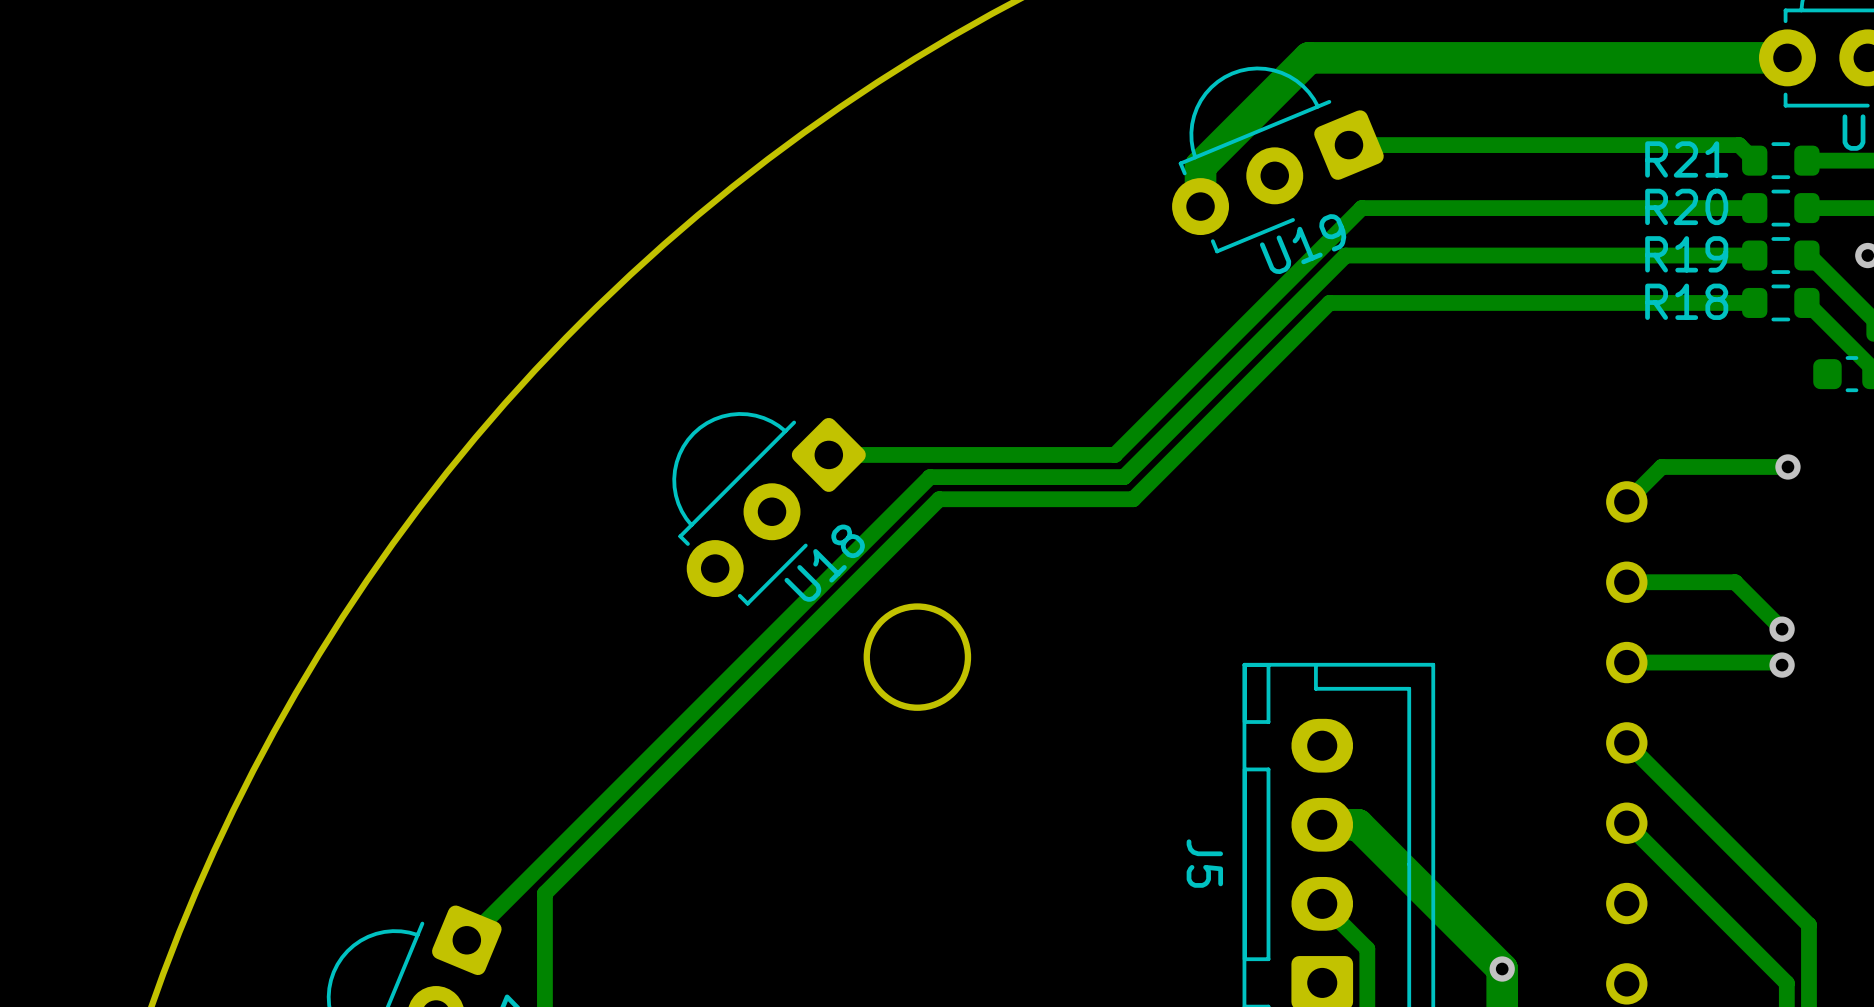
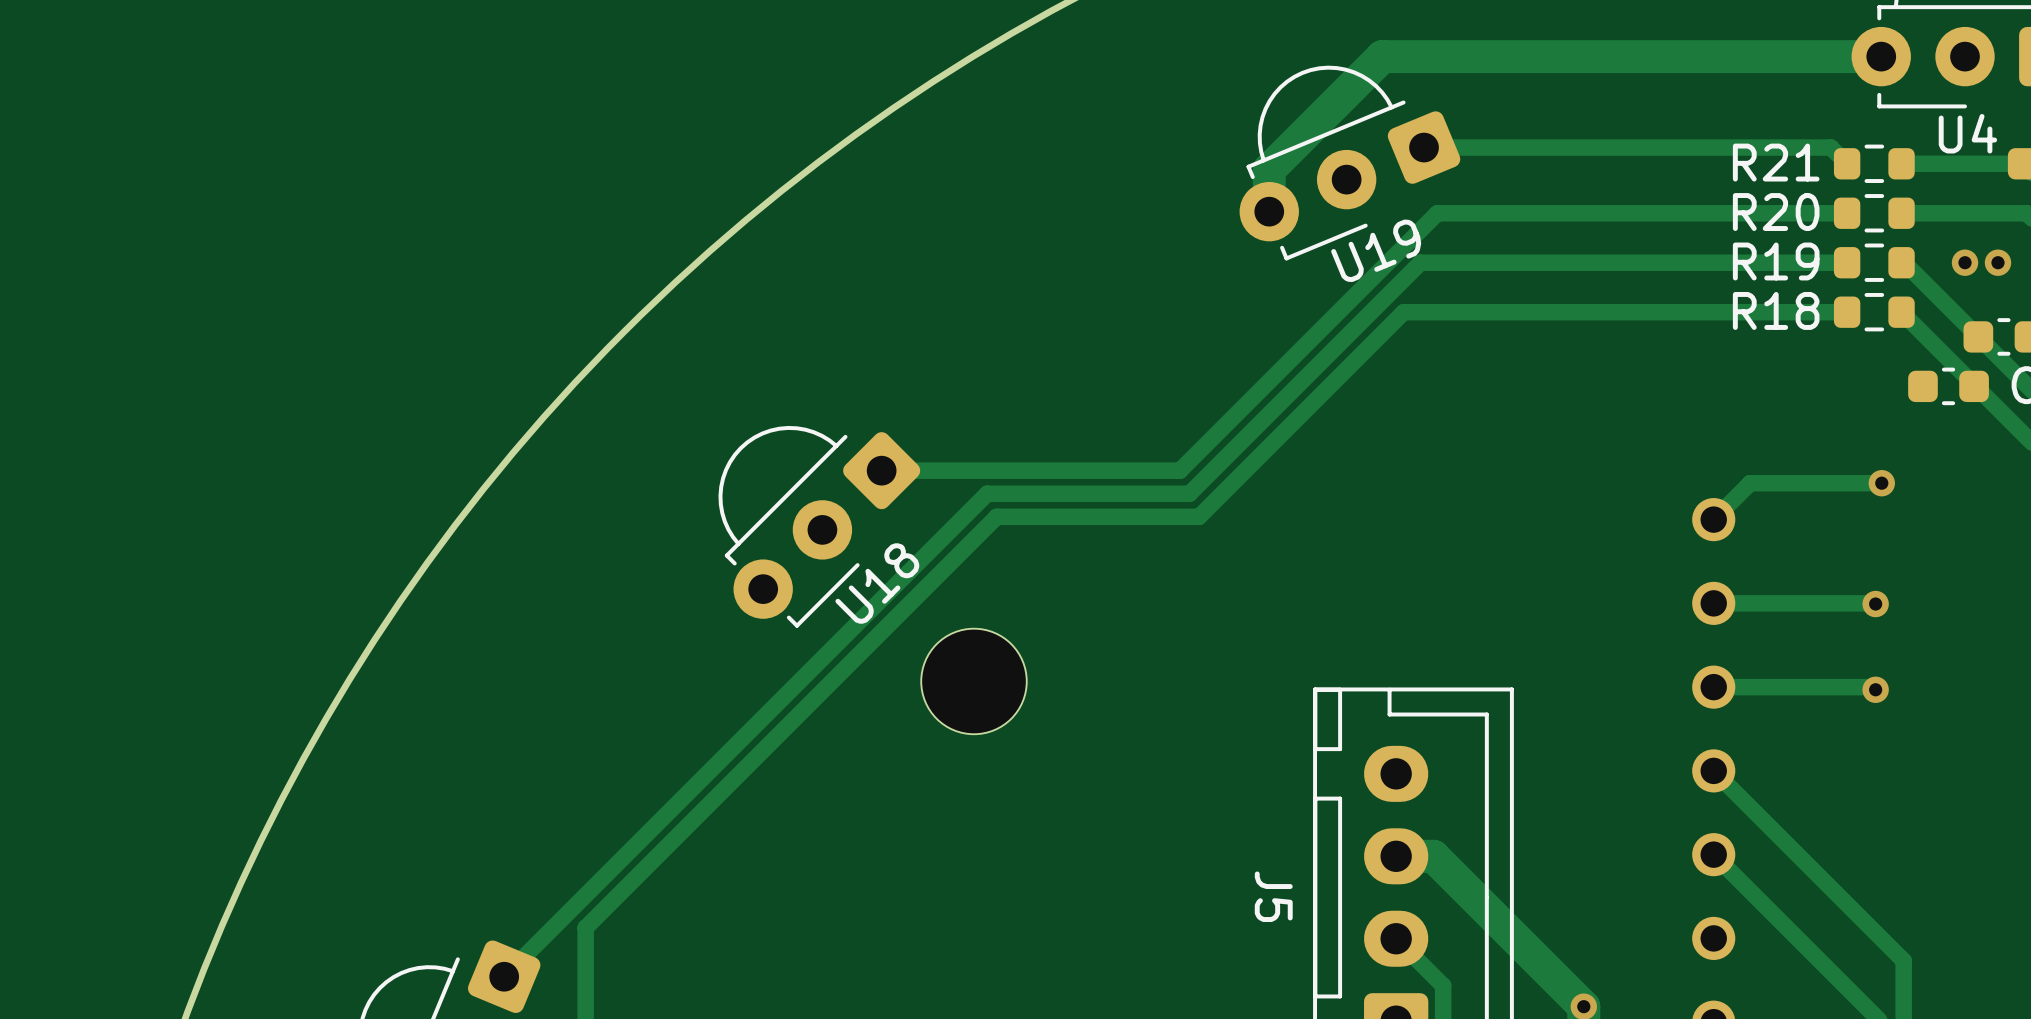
track: (1735, 582) (1782, 629) -> (1826, 603) (1875, 604)
round board edge: [863, 603, 972, 711] -> none
via position: (1782, 629) -> (1875, 604)
part: none -> (973, 681)

